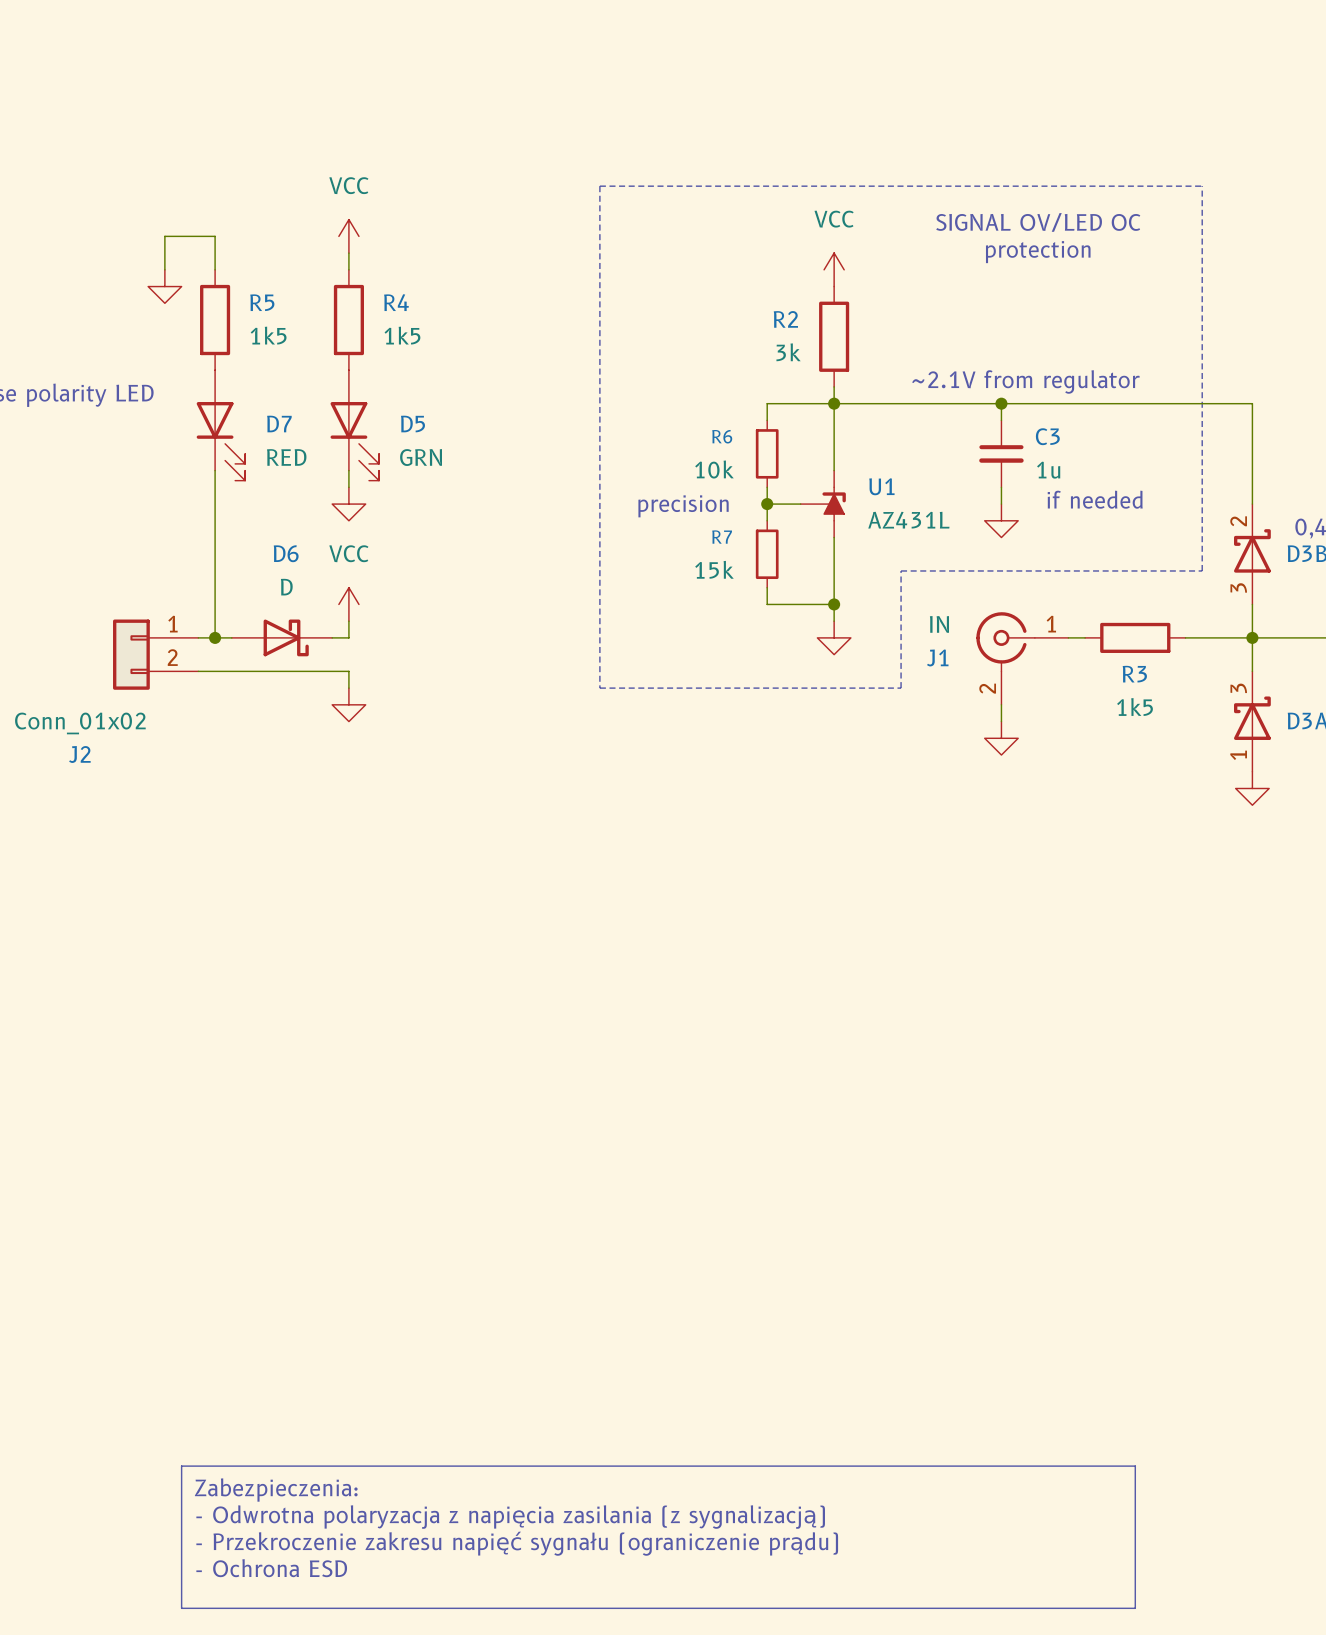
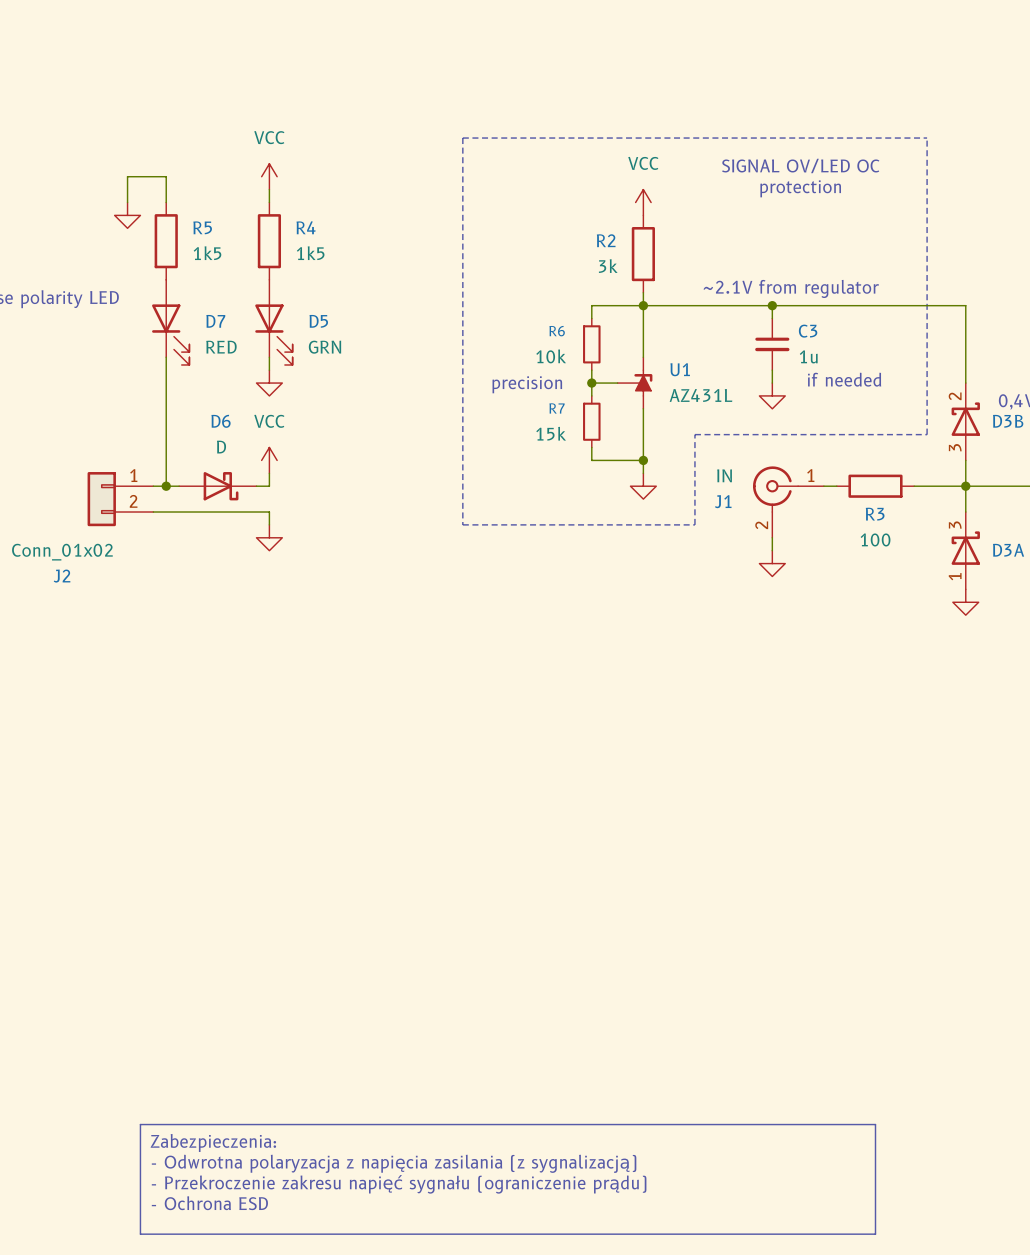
R3 value: 1k5 (1134, 707) -> 100 (875, 539)

